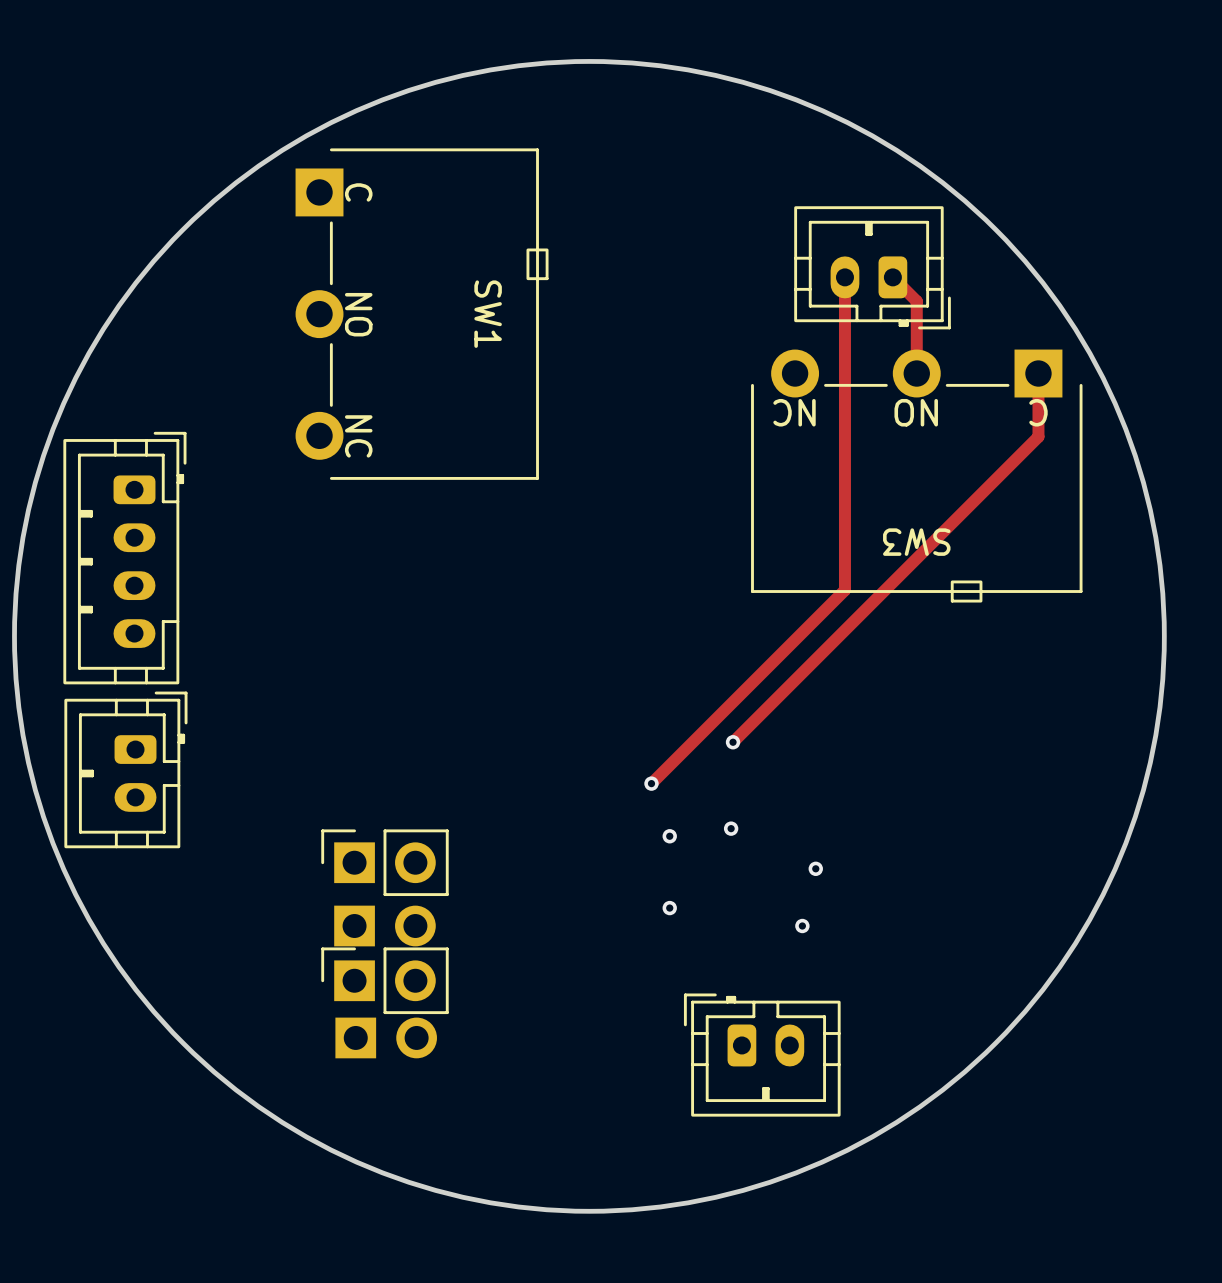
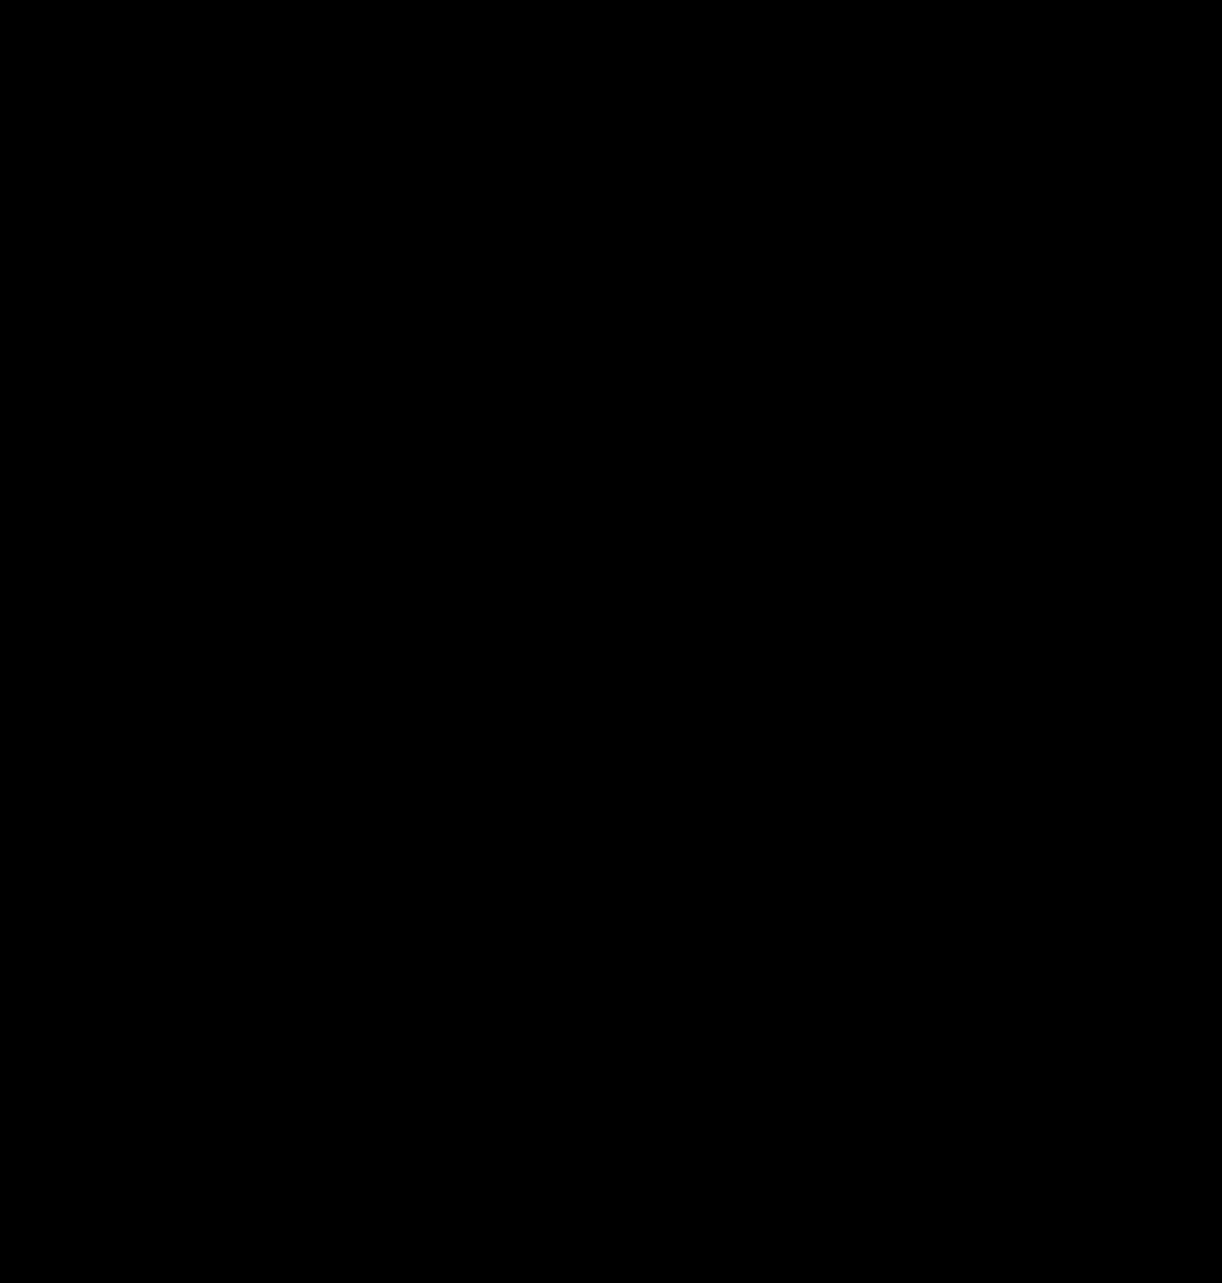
round board edge: [12, 59, 1167, 1214] -> none
part: (872, 267) -> none
track: (844, 277) (844, 590) (651, 783) -> none
track: (892, 277) (916, 301) (916, 373) -> none
SW1: (422, 314) -> none
track: (1038, 373) (1038, 436) (733, 742) -> none
SW3: (916, 476) -> none
part: (124, 558) -> none
via: (733, 742) -> none
part: (125, 769) -> none
via: (651, 783) -> none
via: (731, 828) -> none
via: (669, 836) -> none
part: (384, 862) -> none
via: (815, 868) -> none
via: (669, 908) -> none
part: (384, 926) -> none
via: (802, 926) -> none
part: (384, 980) -> none
part: (386, 1037) -> none
part: (762, 1055) -> none

